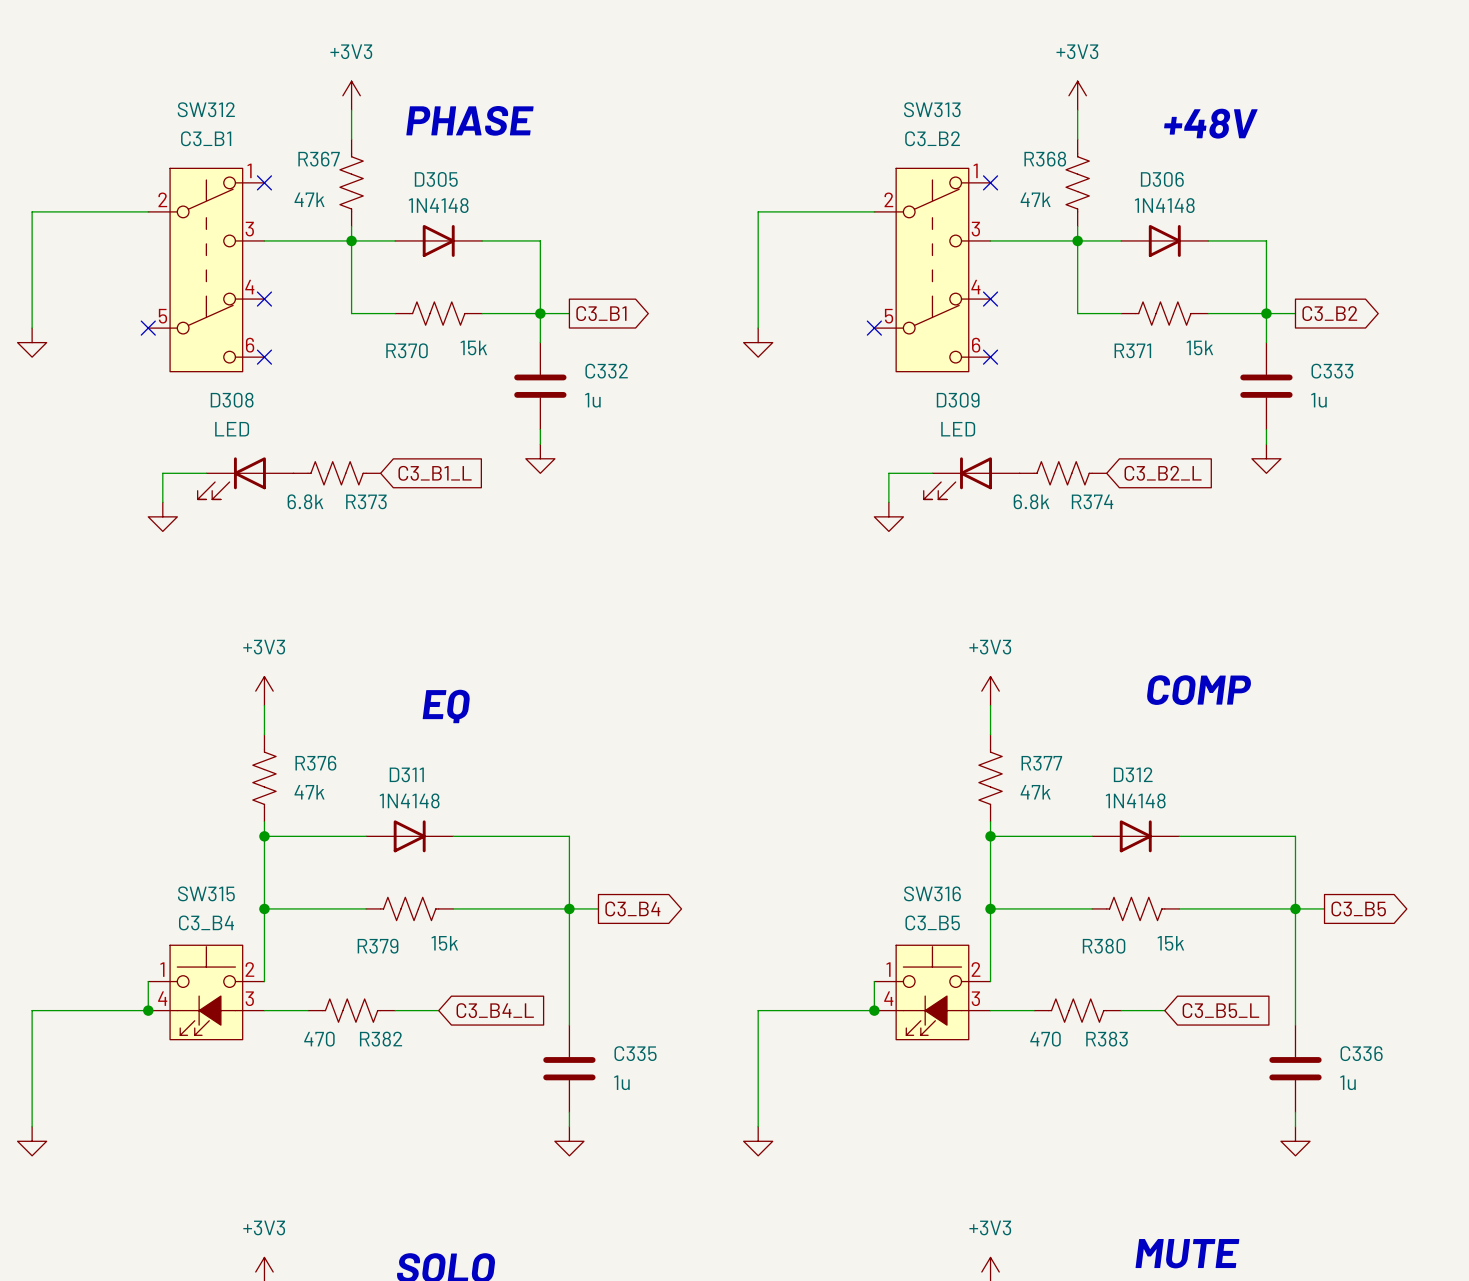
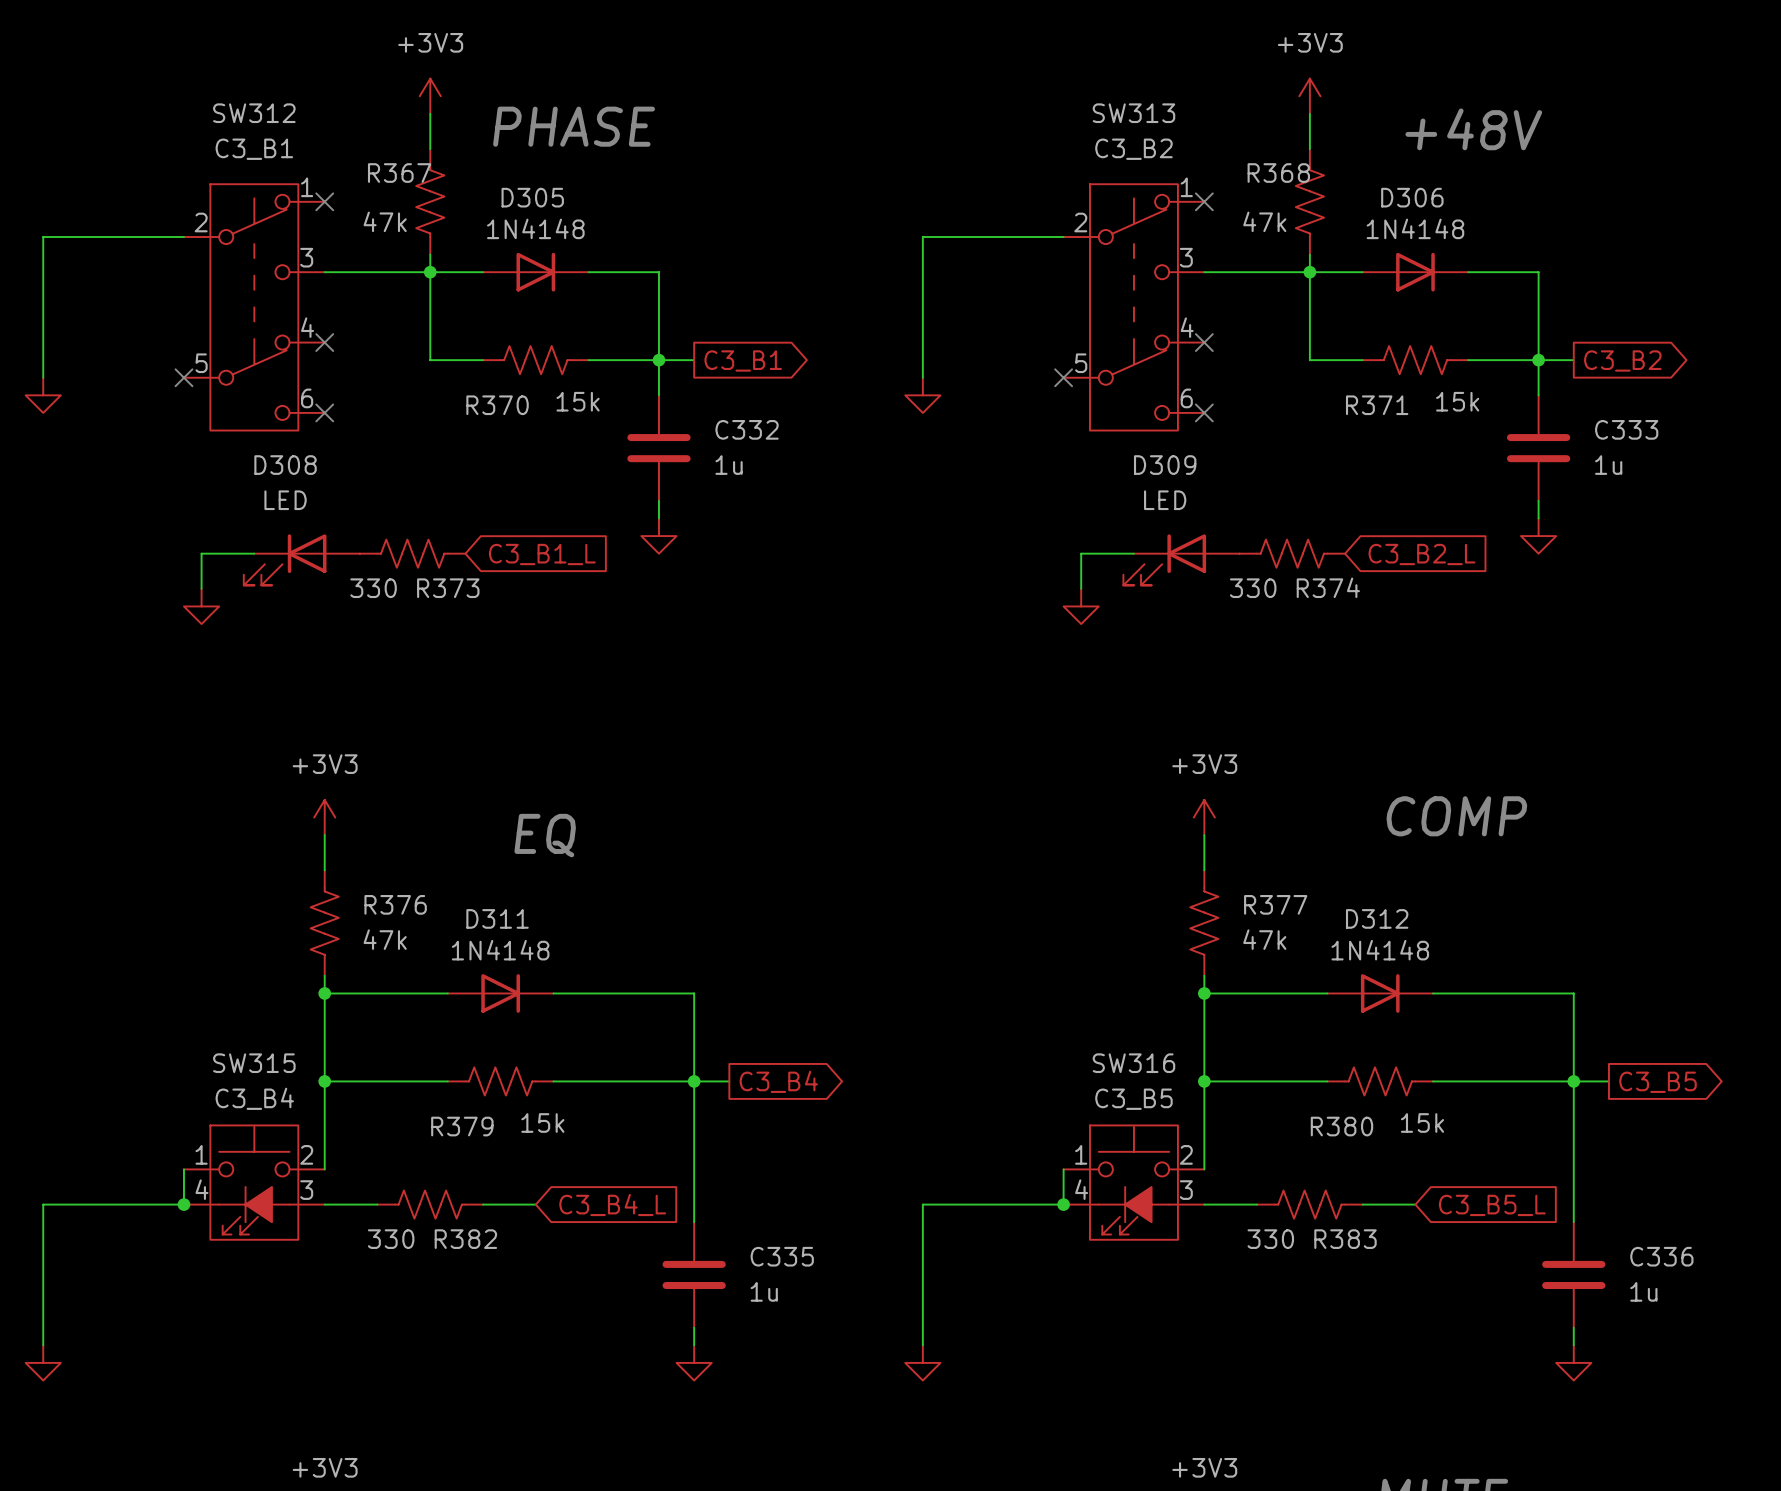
R373 value: 6.8k (305, 501) -> 330 (373, 588)
R374 value: 6.8k (1031, 501) -> 330 (1253, 588)
R382 value: 470 (319, 1039) -> 330 (391, 1239)
R383 value: 470 (1045, 1039) -> 330 (1270, 1239)

